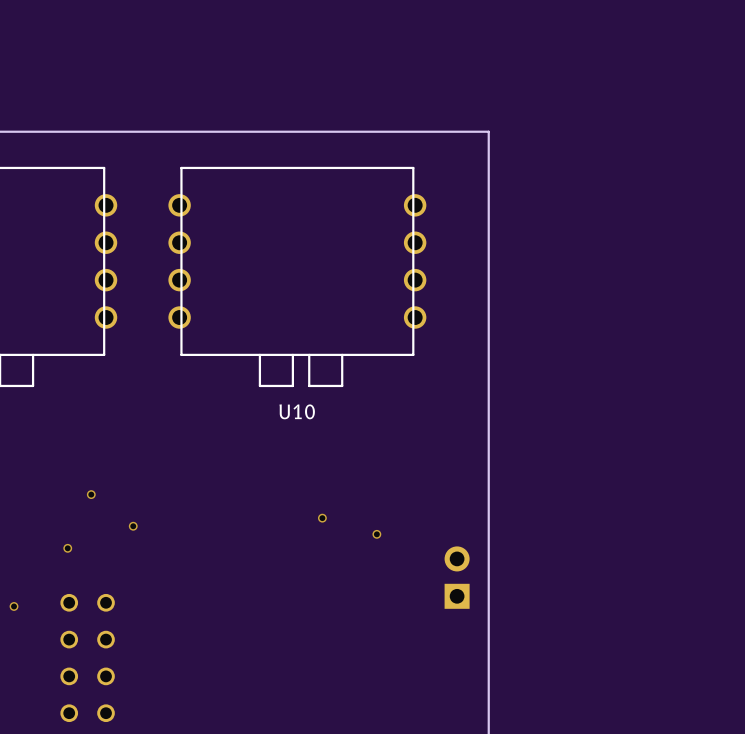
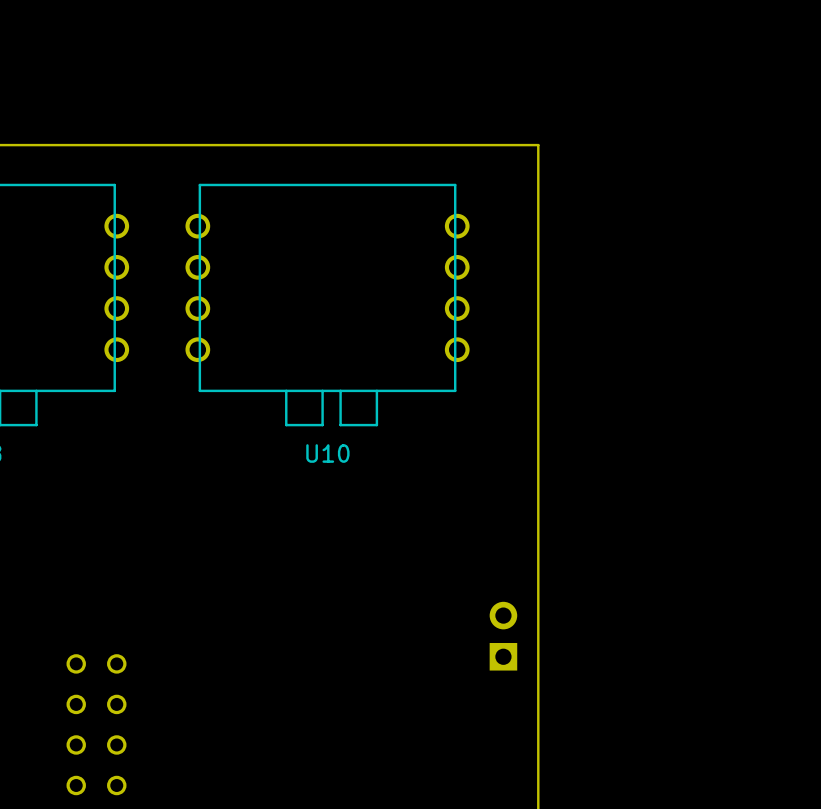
via: (91, 494) -> none
via: (322, 518) -> none
via: (133, 526) -> none
via: (376, 534) -> none
via: (67, 548) -> none
via: (14, 606) -> none

